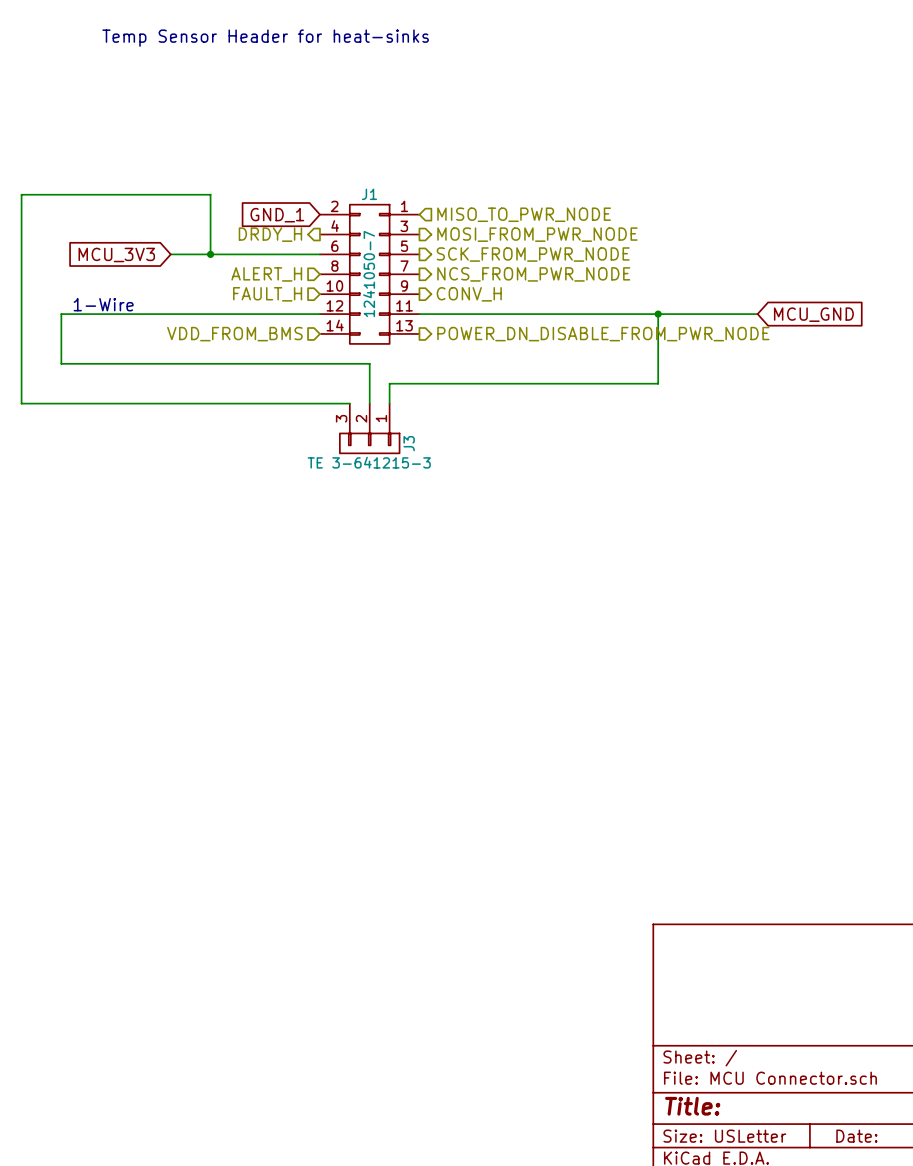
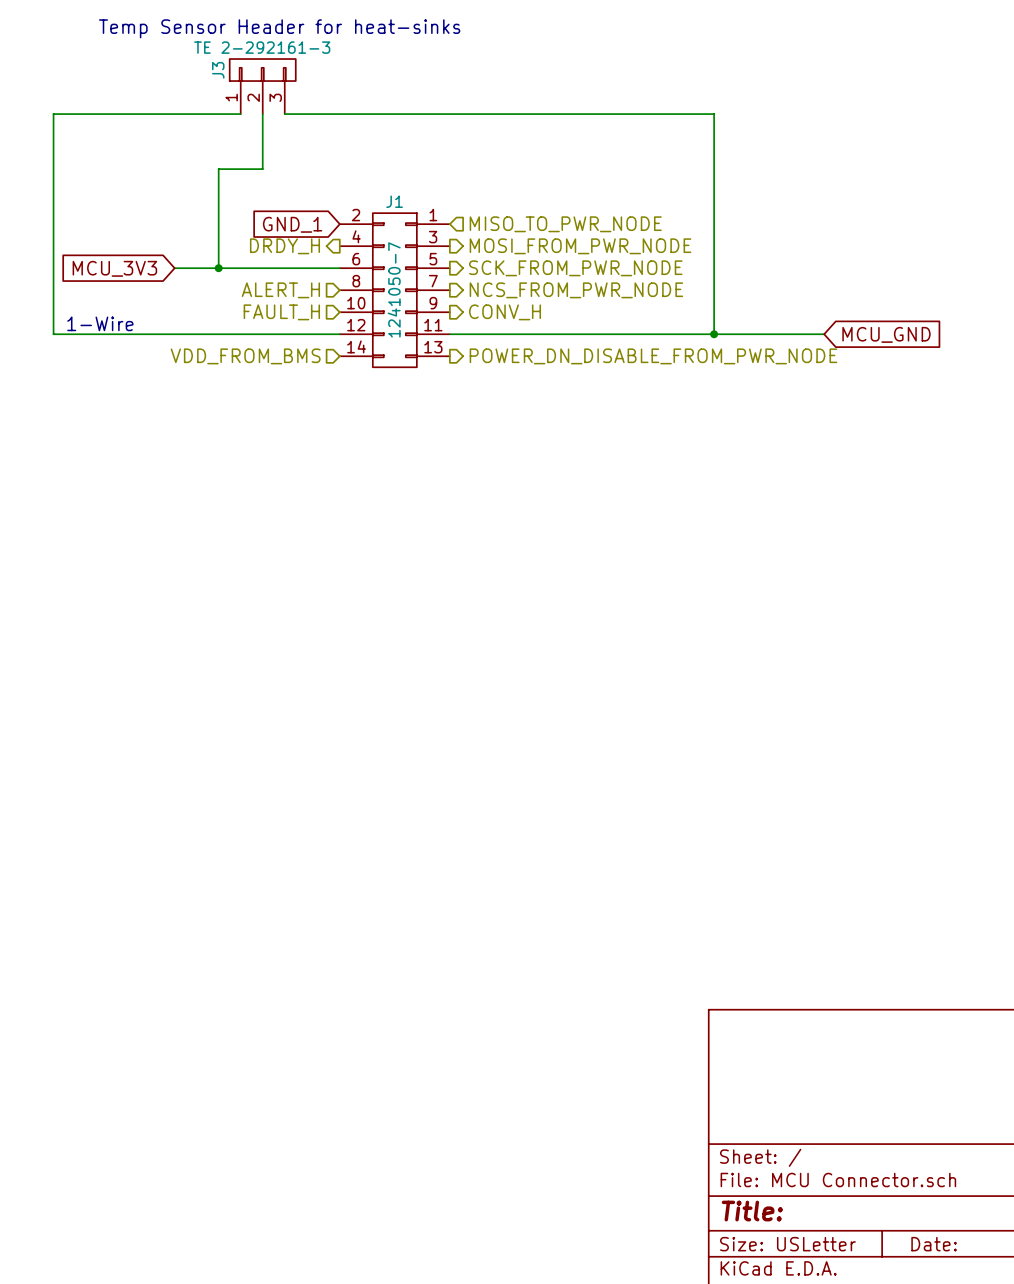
wire: (210, 194) (21, 194) (21, 403) (349, 403) -> (218, 202) (218, 169) (262, 169) (262, 114)
wire: (61, 314) (61, 363) (369, 363) (369, 403) -> (53, 334) (53, 114) (240, 114)
wire: (658, 314) (658, 383) (389, 383) (389, 403) -> (714, 334) (714, 114) (284, 114)
J3 position: (369, 428) -> (262, 86)
J3 rotation: 0° (369, 443) -> 180° (262, 70)
J3 value: TE 3-641215-3 (369, 462) -> TE 2-292161-3 (262, 47)

